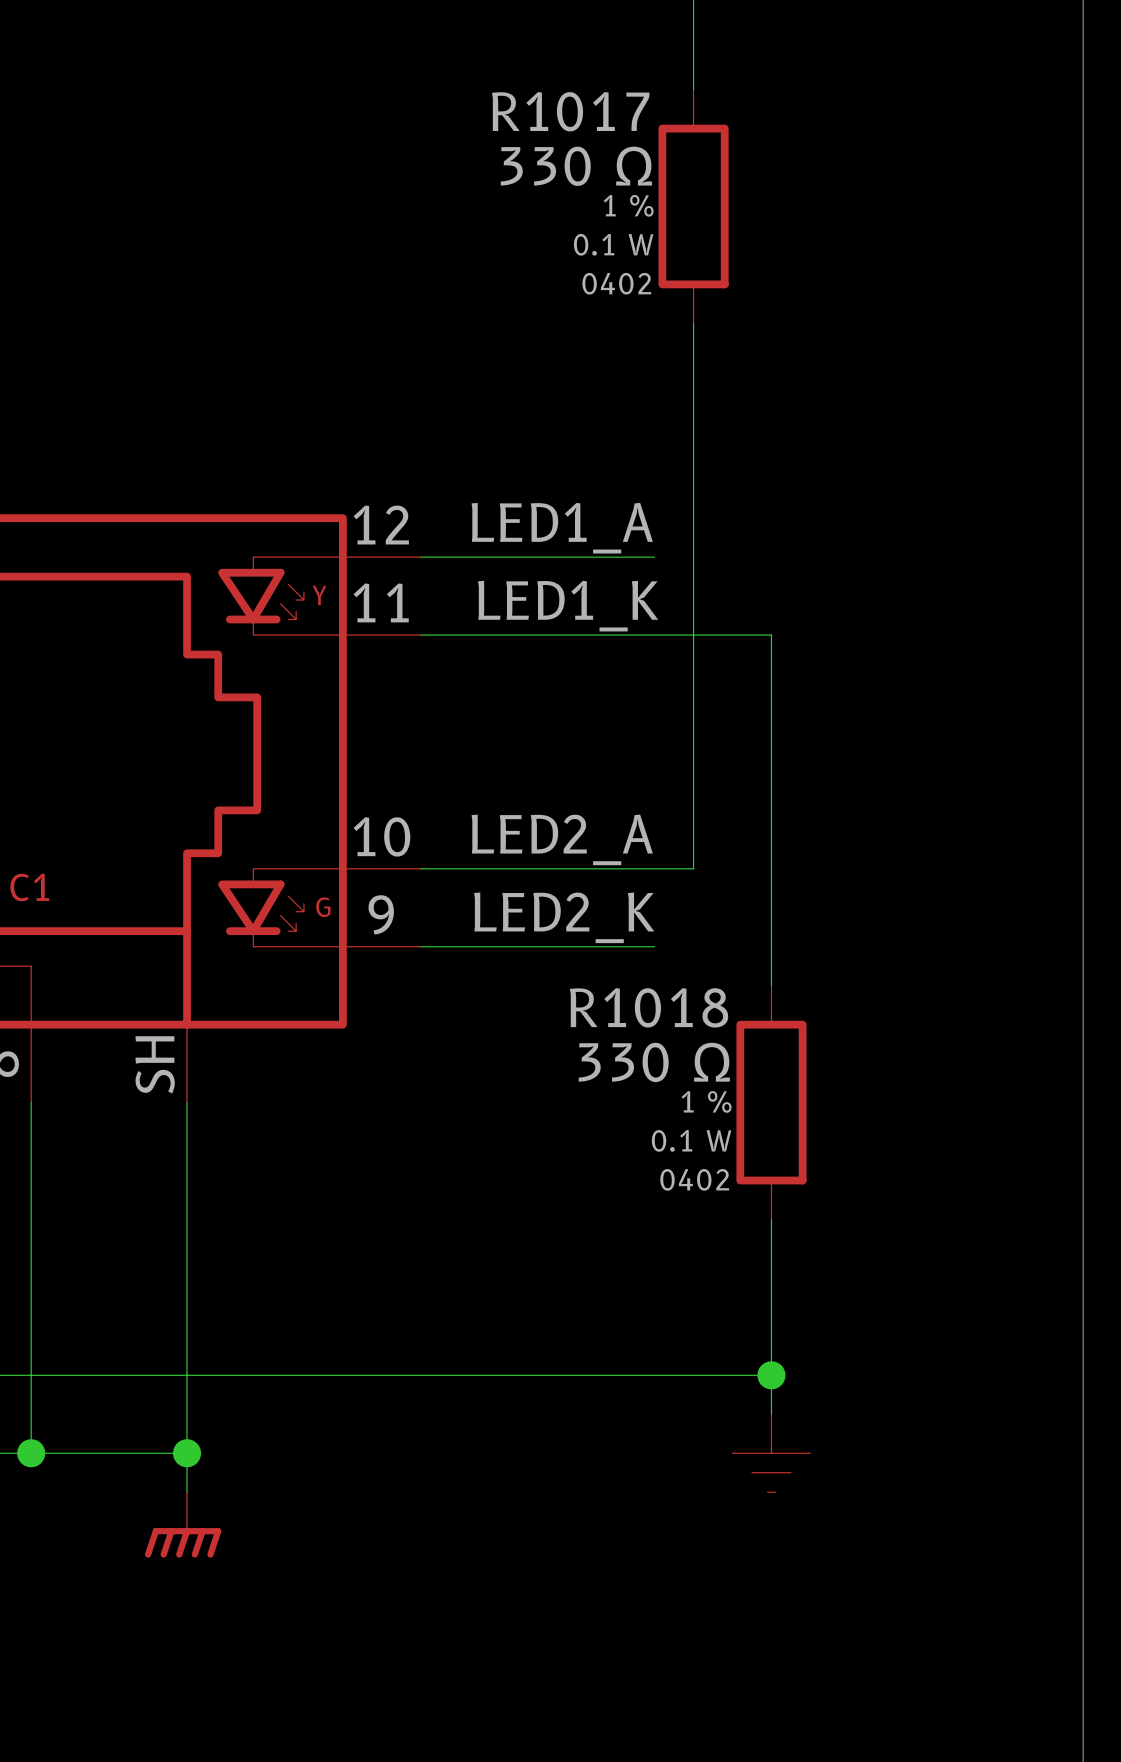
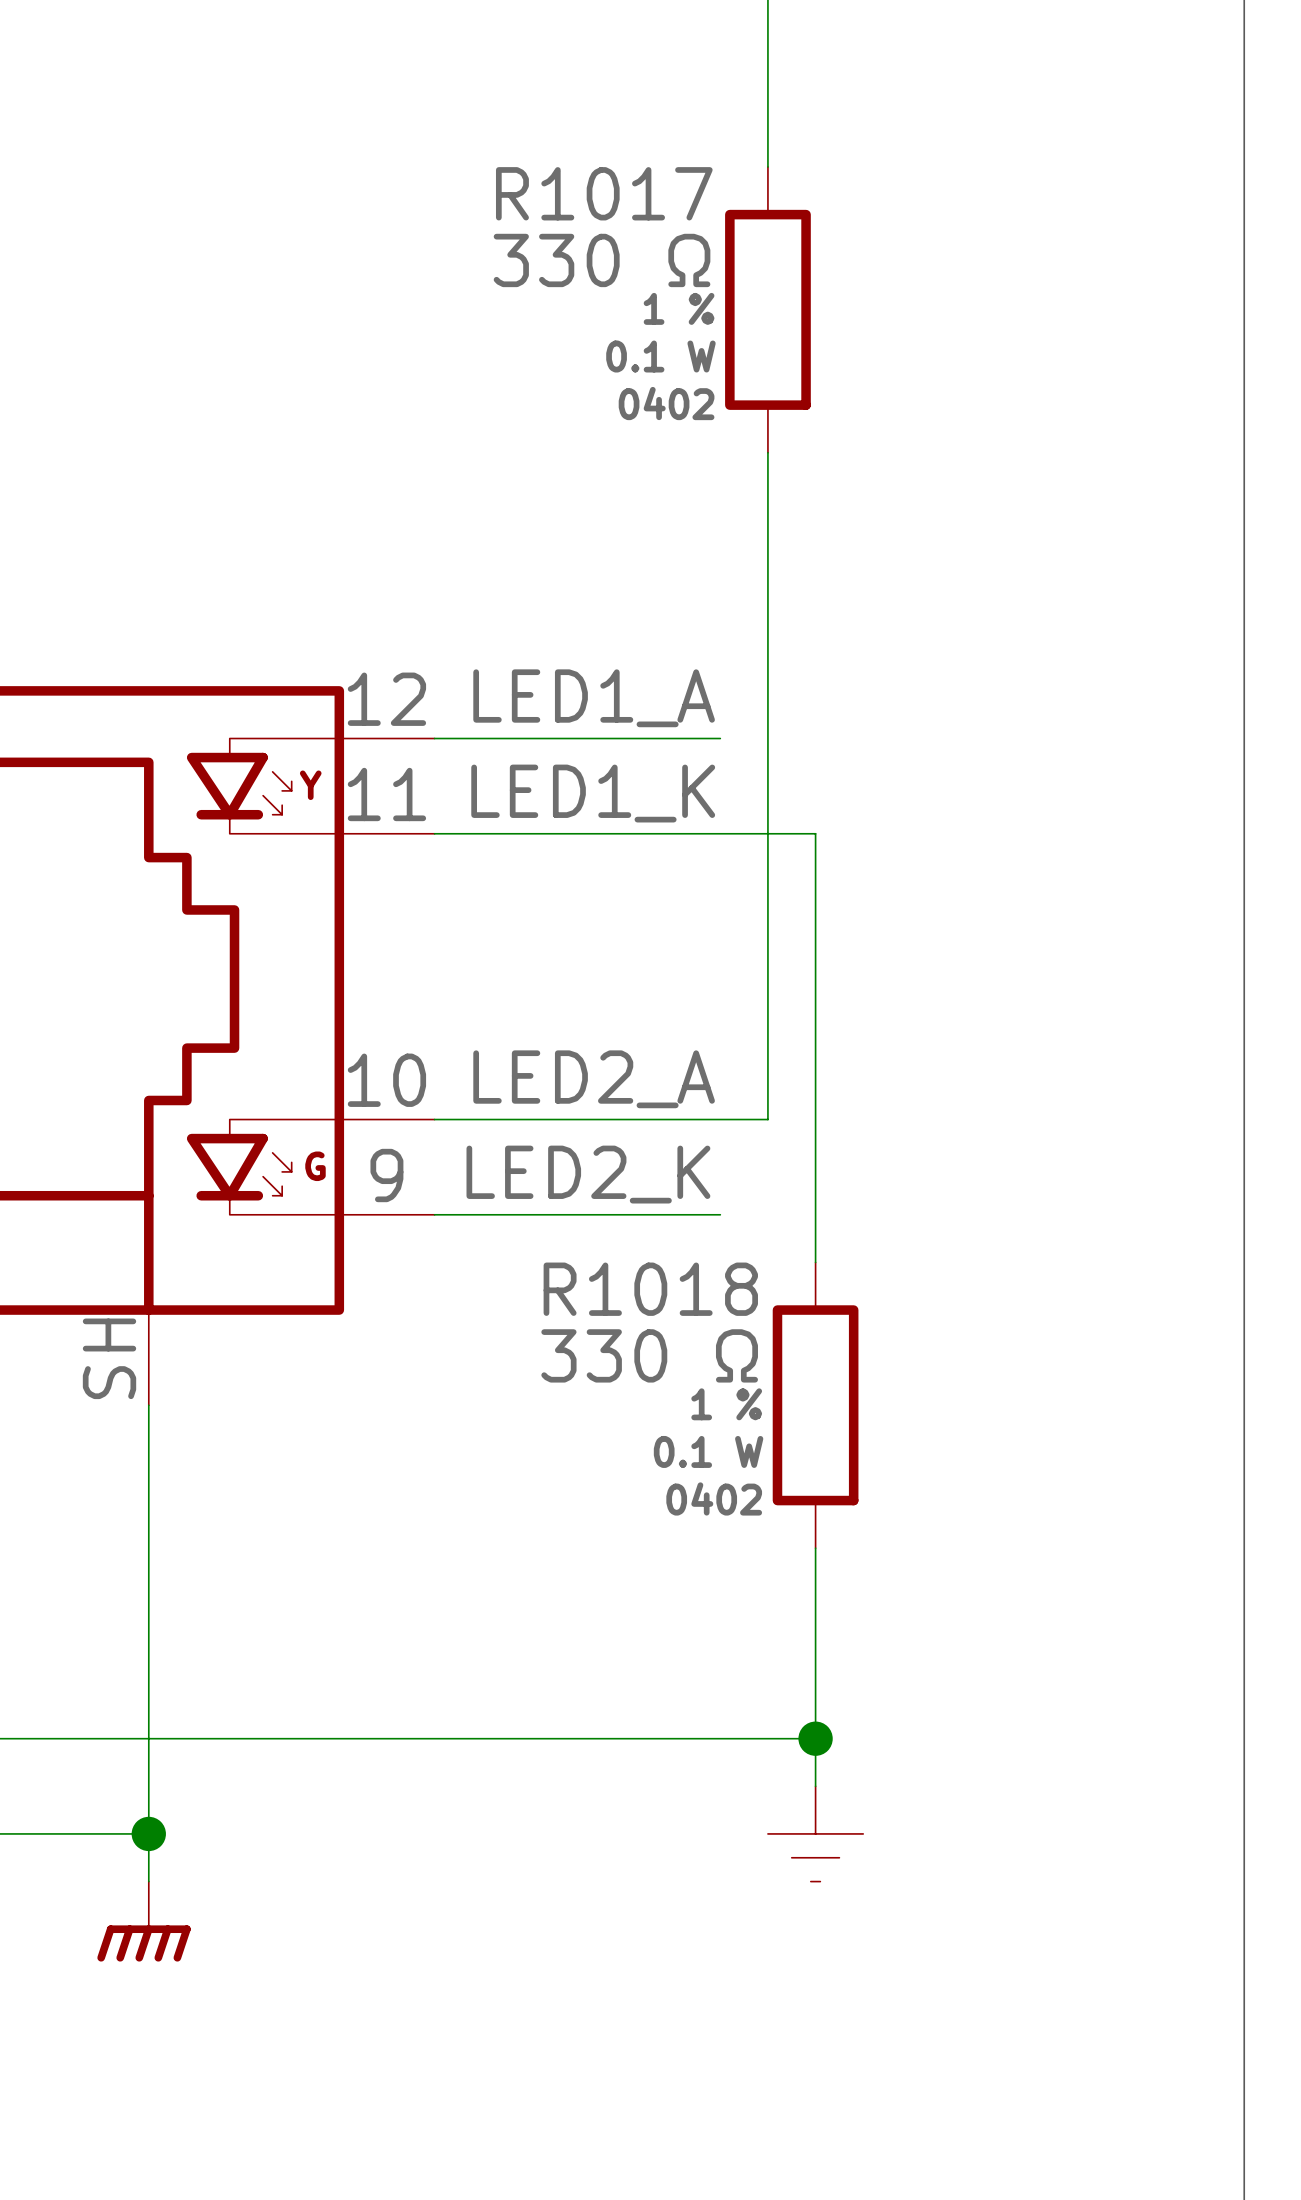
wire: (732, 635) (771, 635) (771, 985) -> (815, 833) (815, 1262)
R1018 position: (771, 1102) -> (815, 1405)
wire: (771, 1219) (771, 1414) -> (815, 1548) (815, 1786)
wire: (732, 1375) (771, 1375) -> none
junction position: (771, 1375) -> (815, 1738)
power symbol position: (771, 1453) -> (815, 1833)

